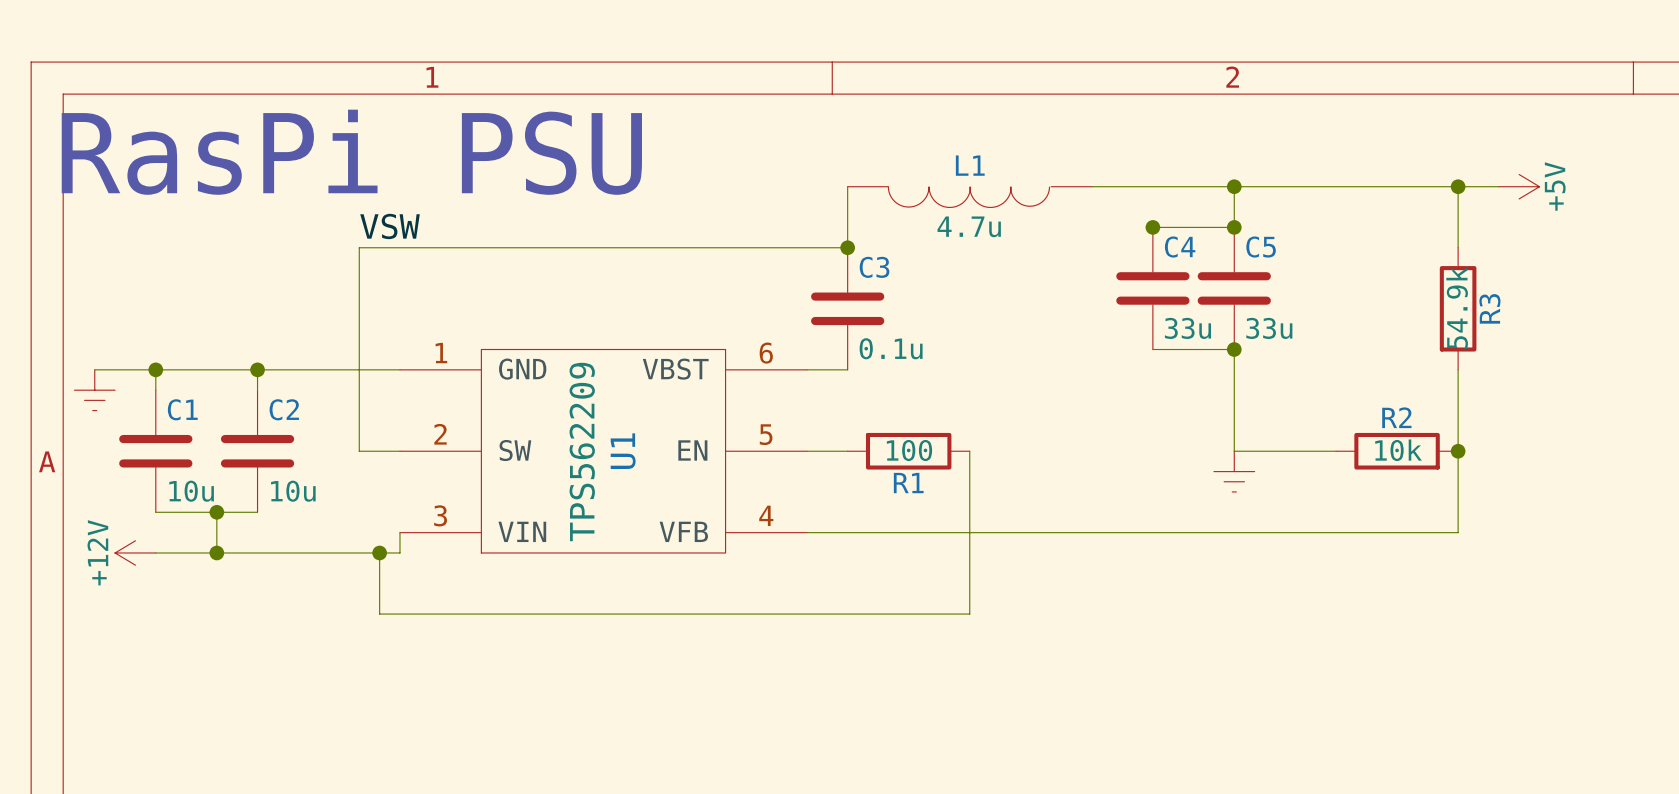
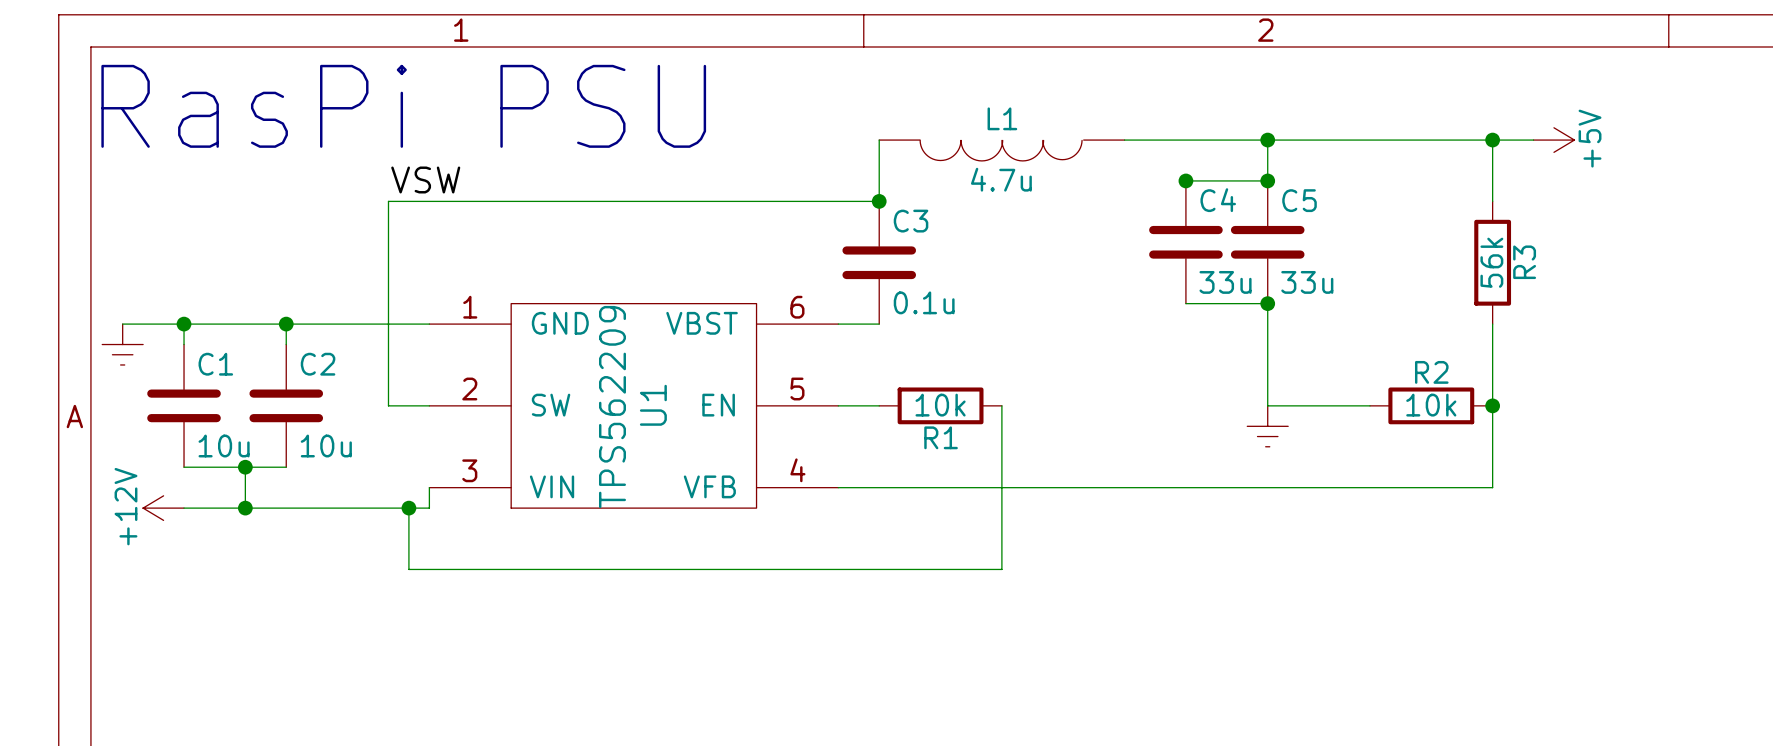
R3 value: 54.9k (1457, 308) -> 56k (1491, 262)
R1 value: 100 (909, 450) -> 10k (940, 405)

